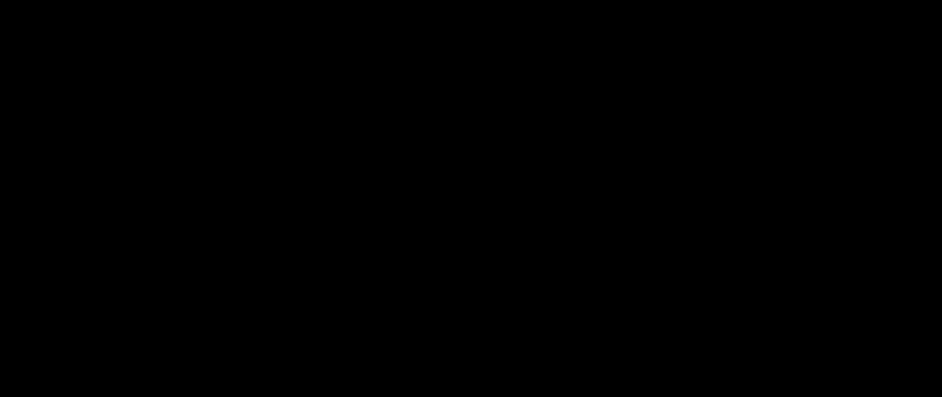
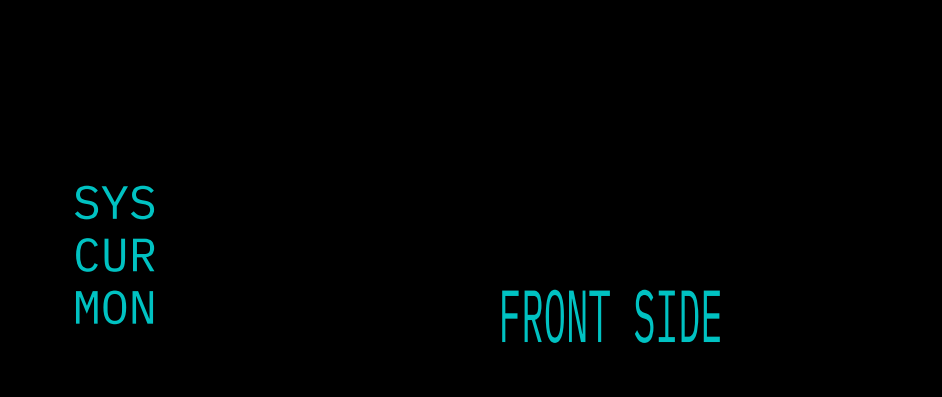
text: none -> SYS (114, 202)
text: none -> CUR (115, 254)
text: none -> MON (114, 307)
text: none -> FRONT SIDE (611, 316)

